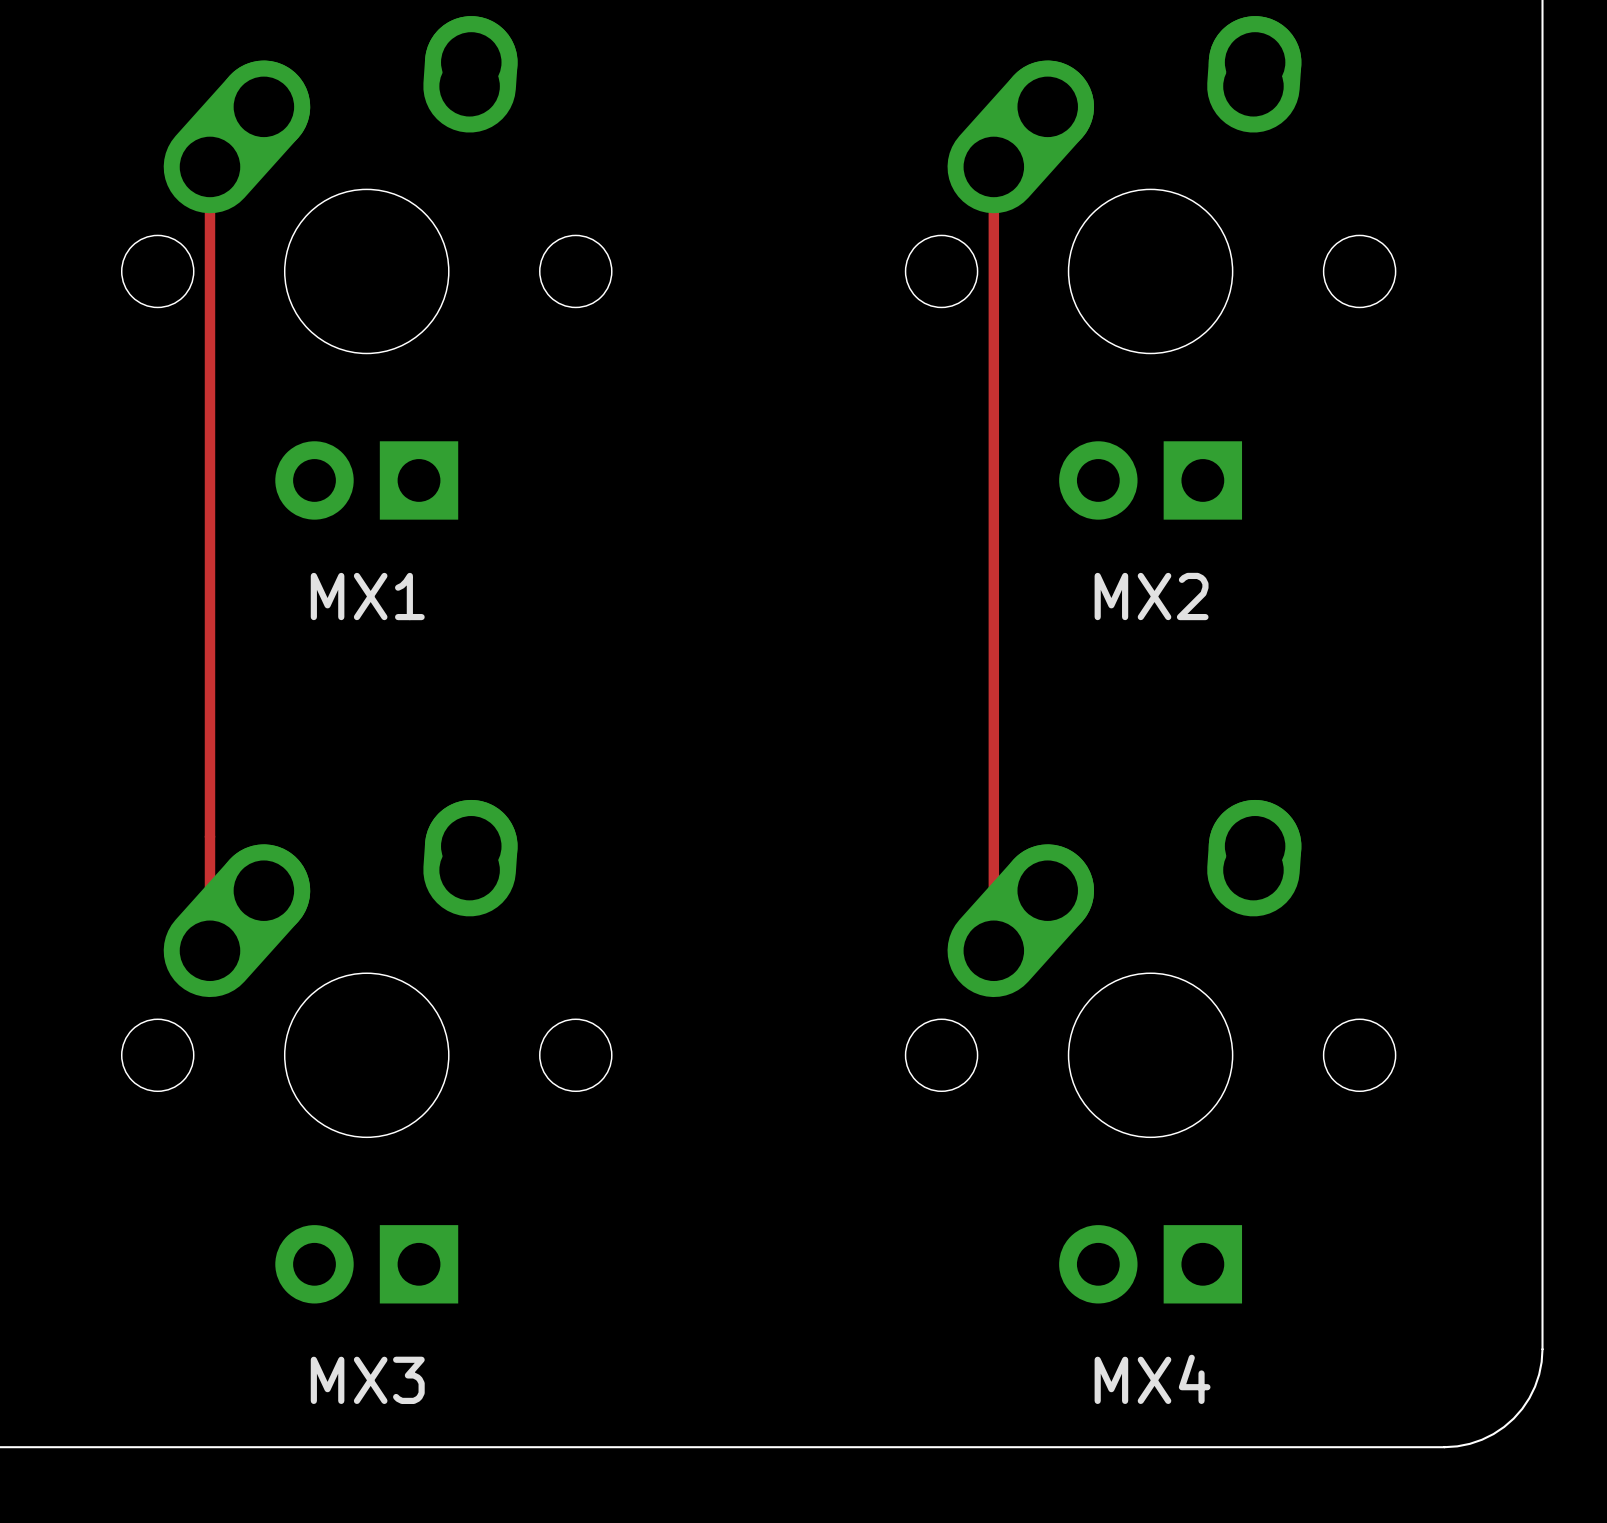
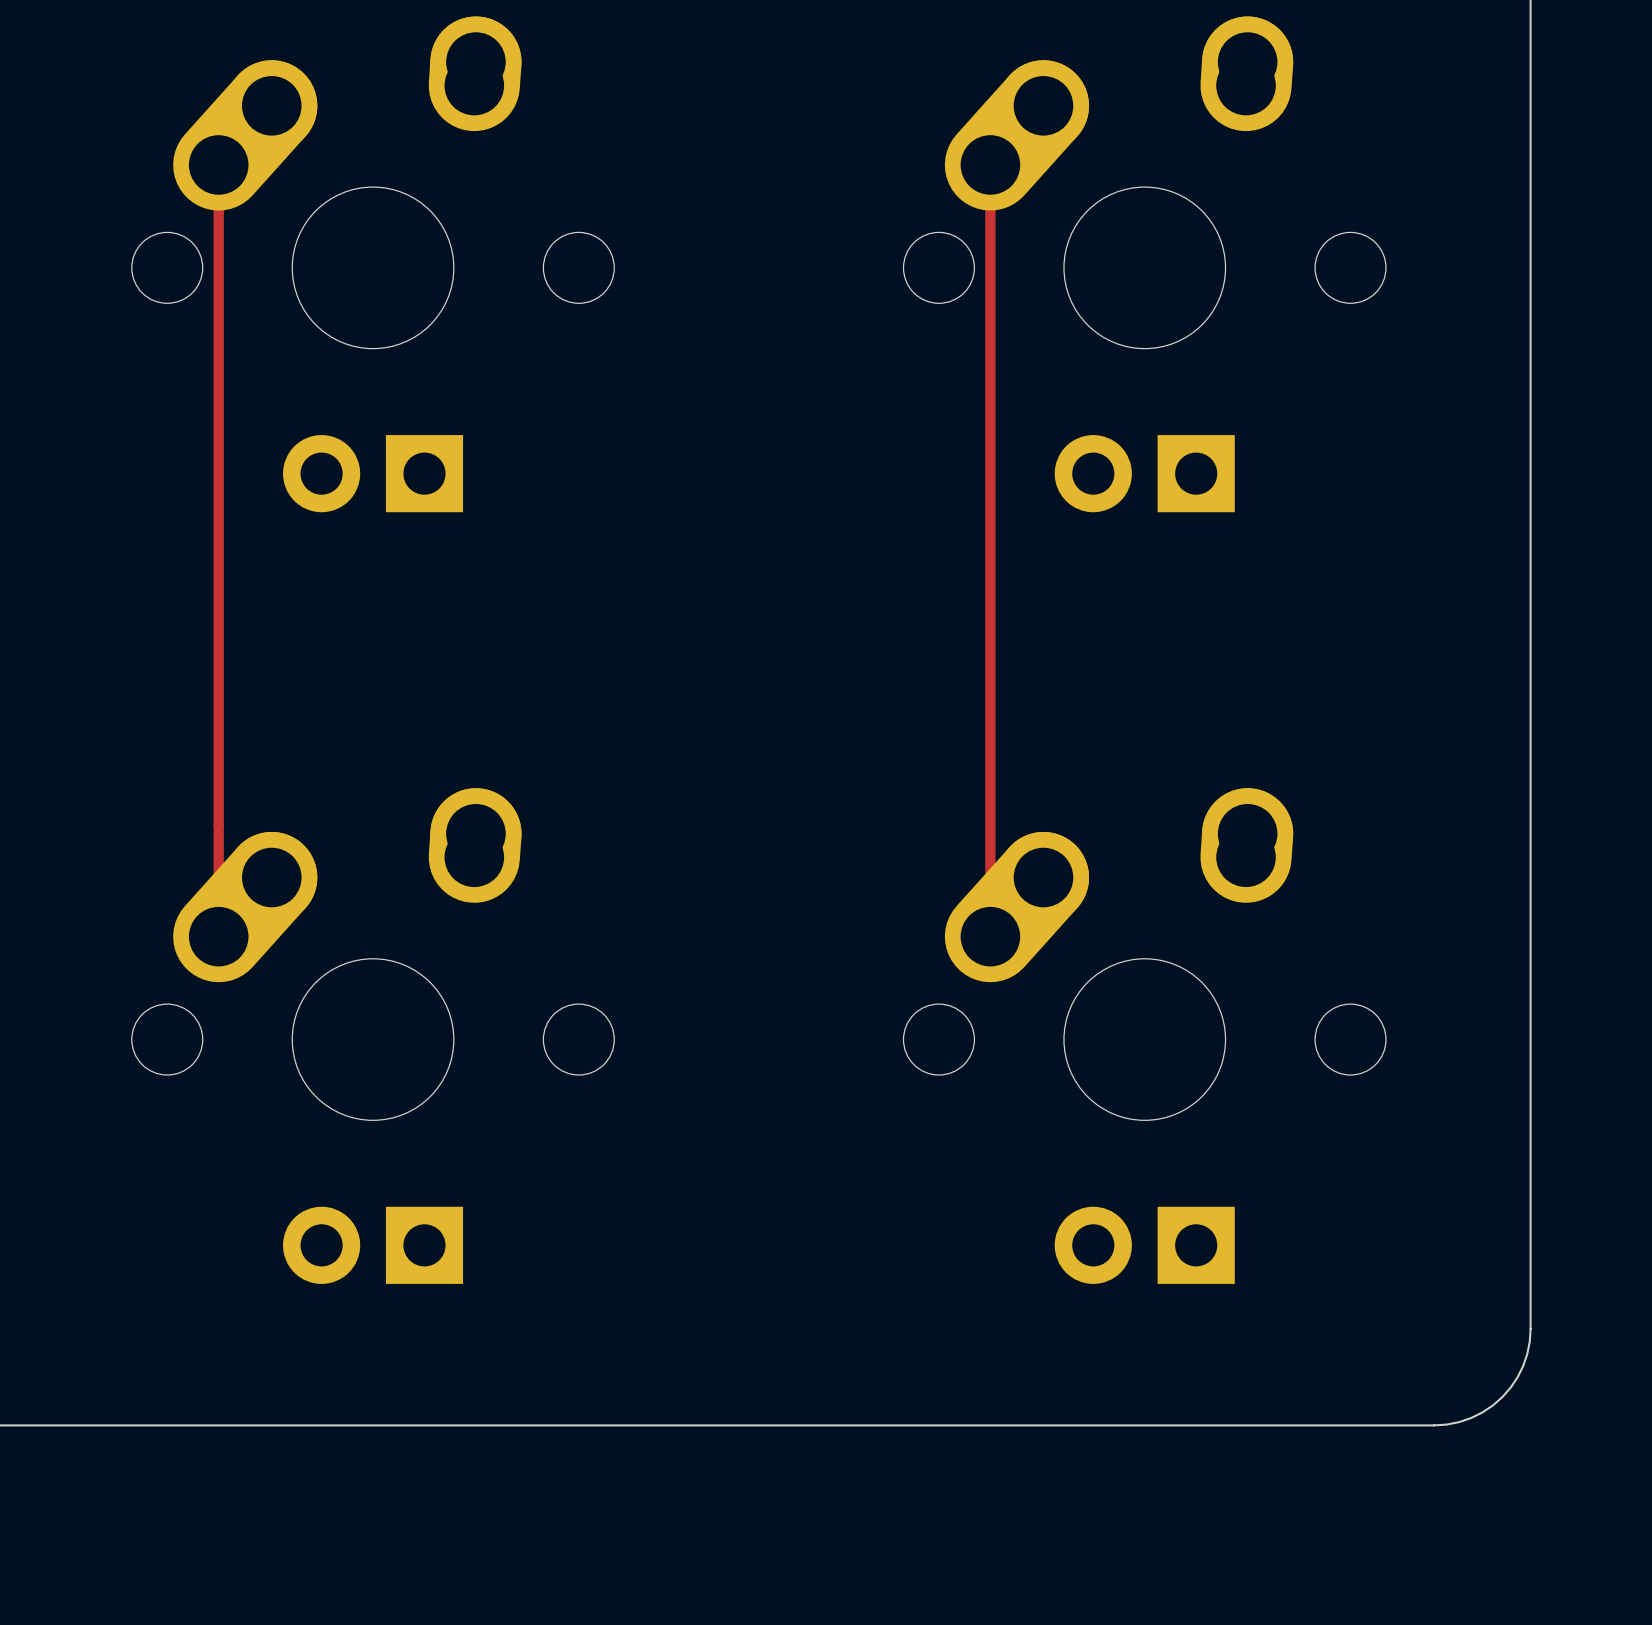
text: MX1 (367, 596) -> none
text: MX2 (1151, 596) -> none
text: MX4 (1152, 1379) -> none
text: MX3 (367, 1380) -> none

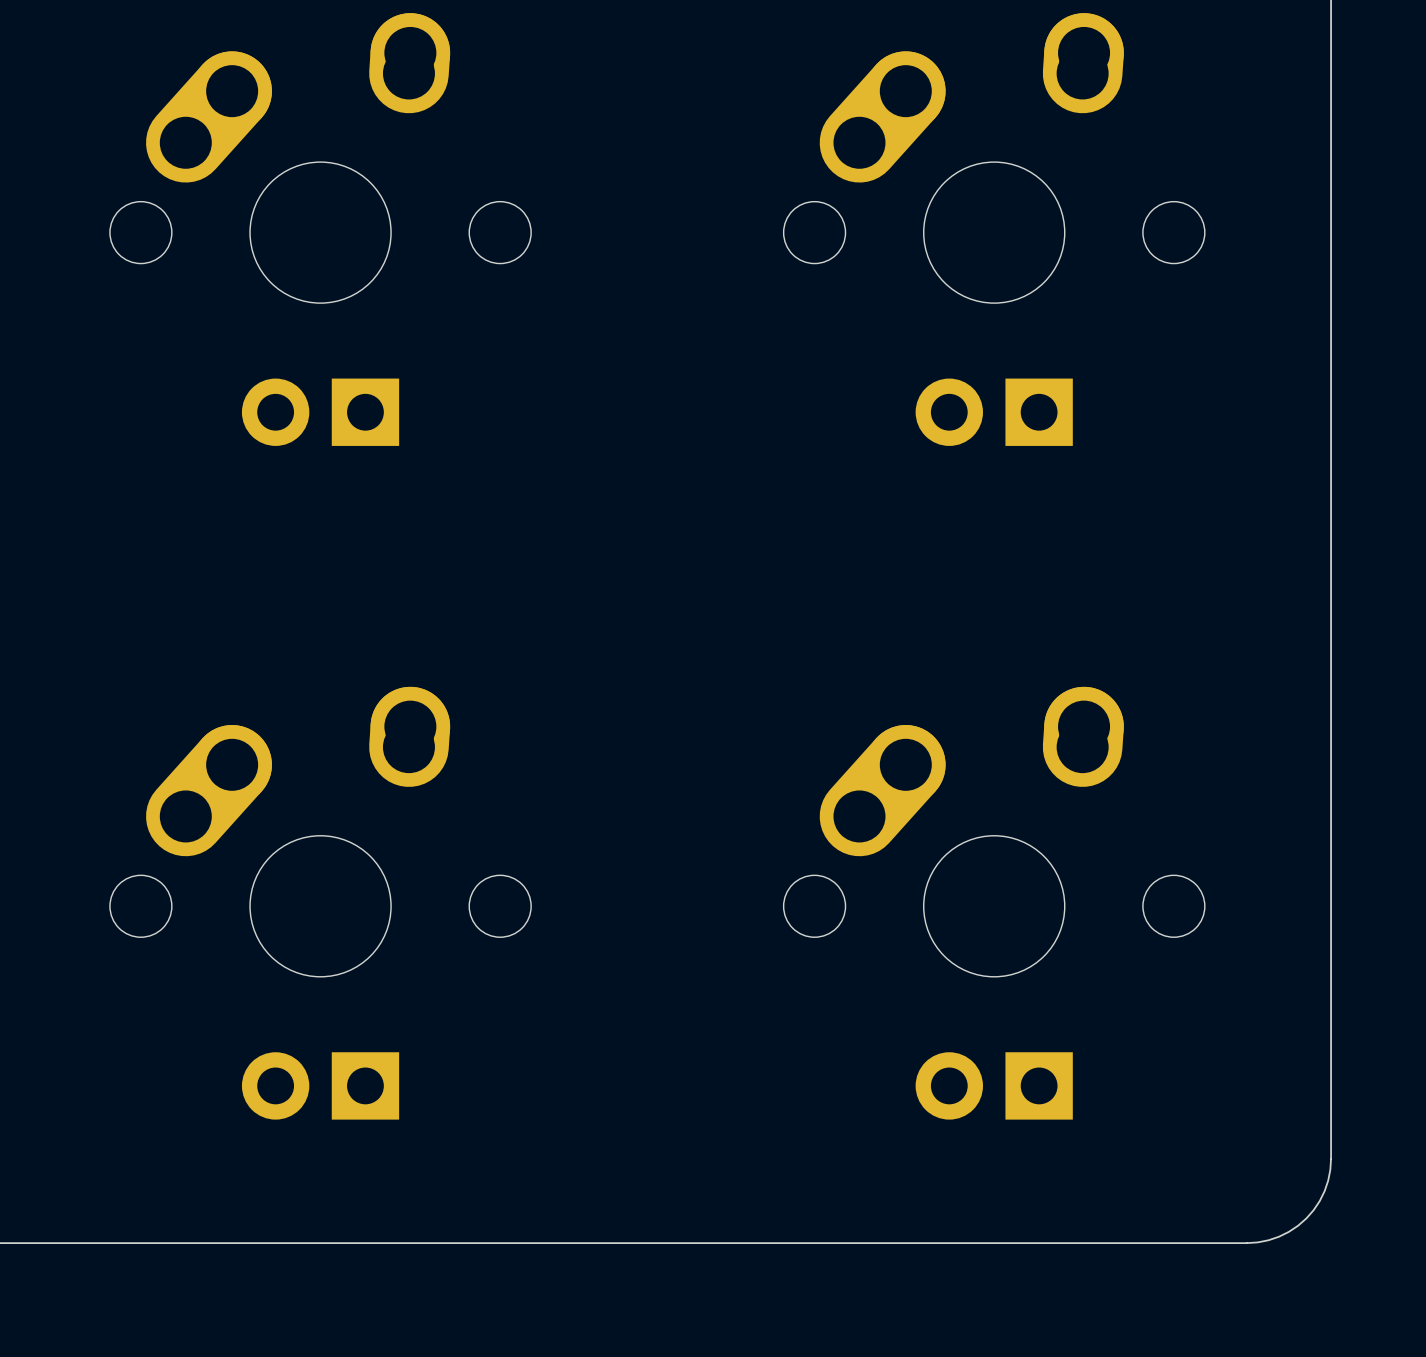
track: (218, 164) (218, 936) -> none
track: (990, 164) (990, 936) -> none

